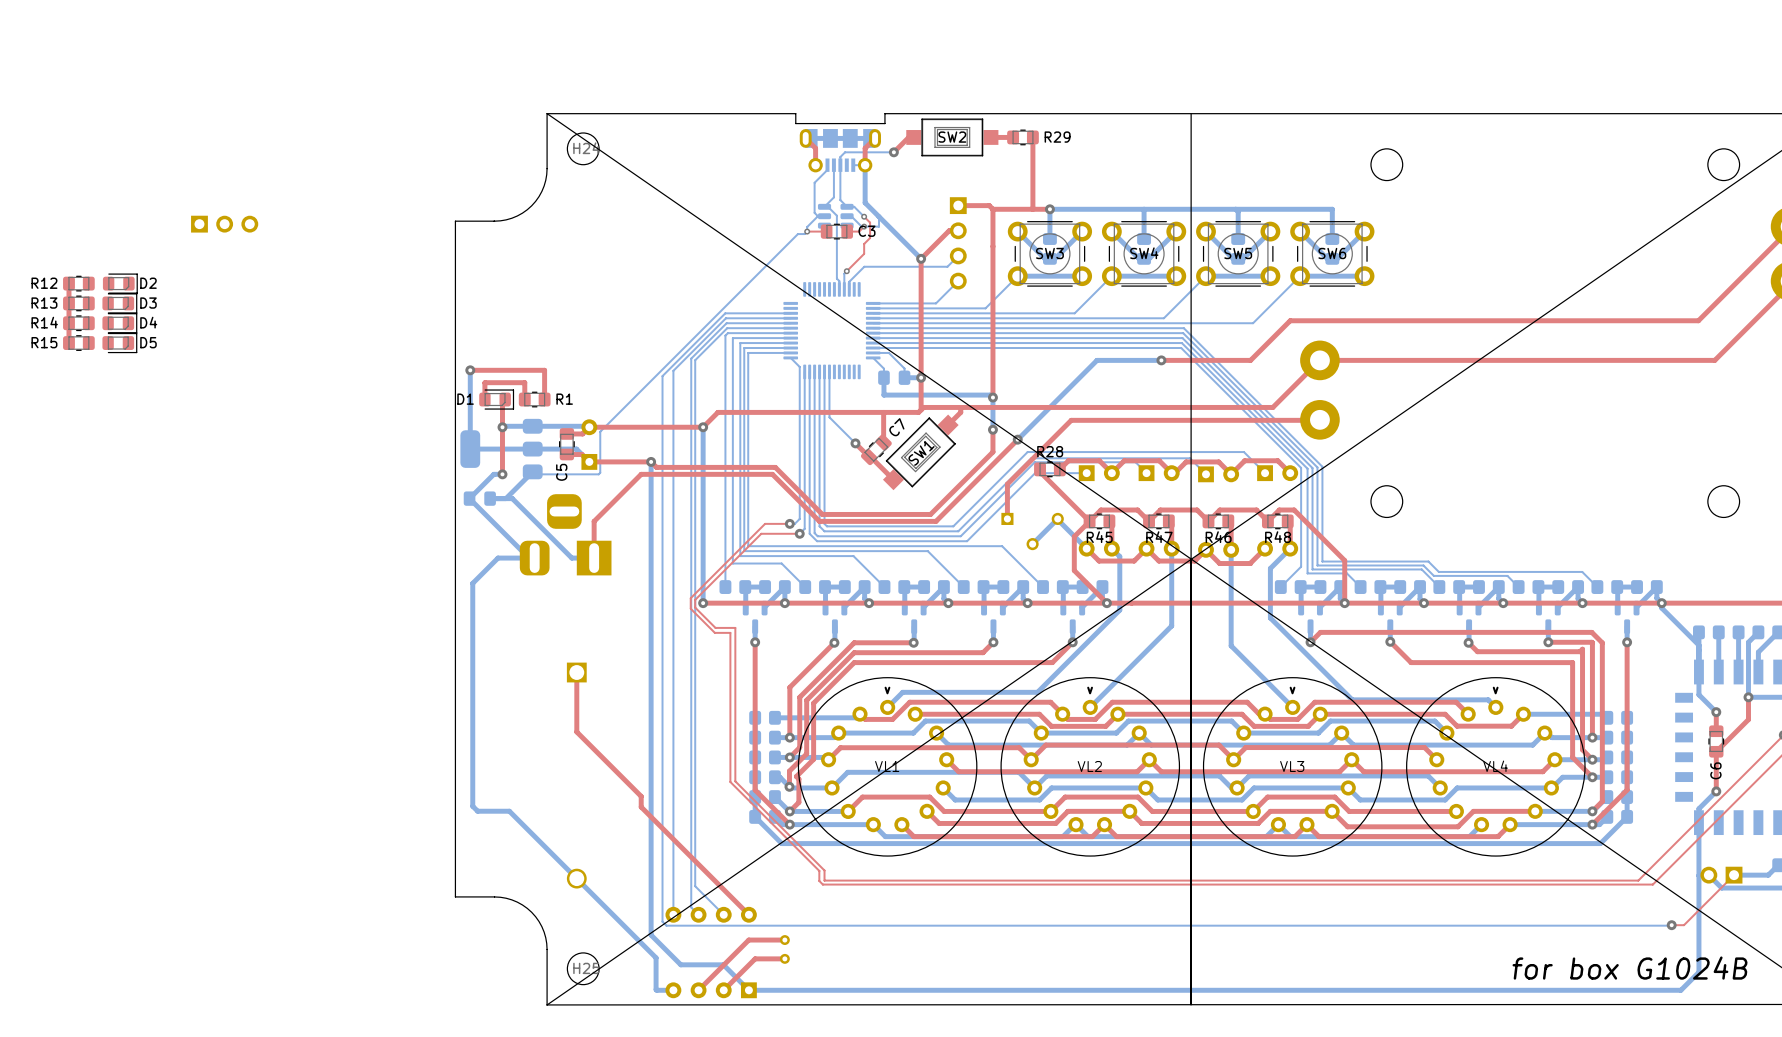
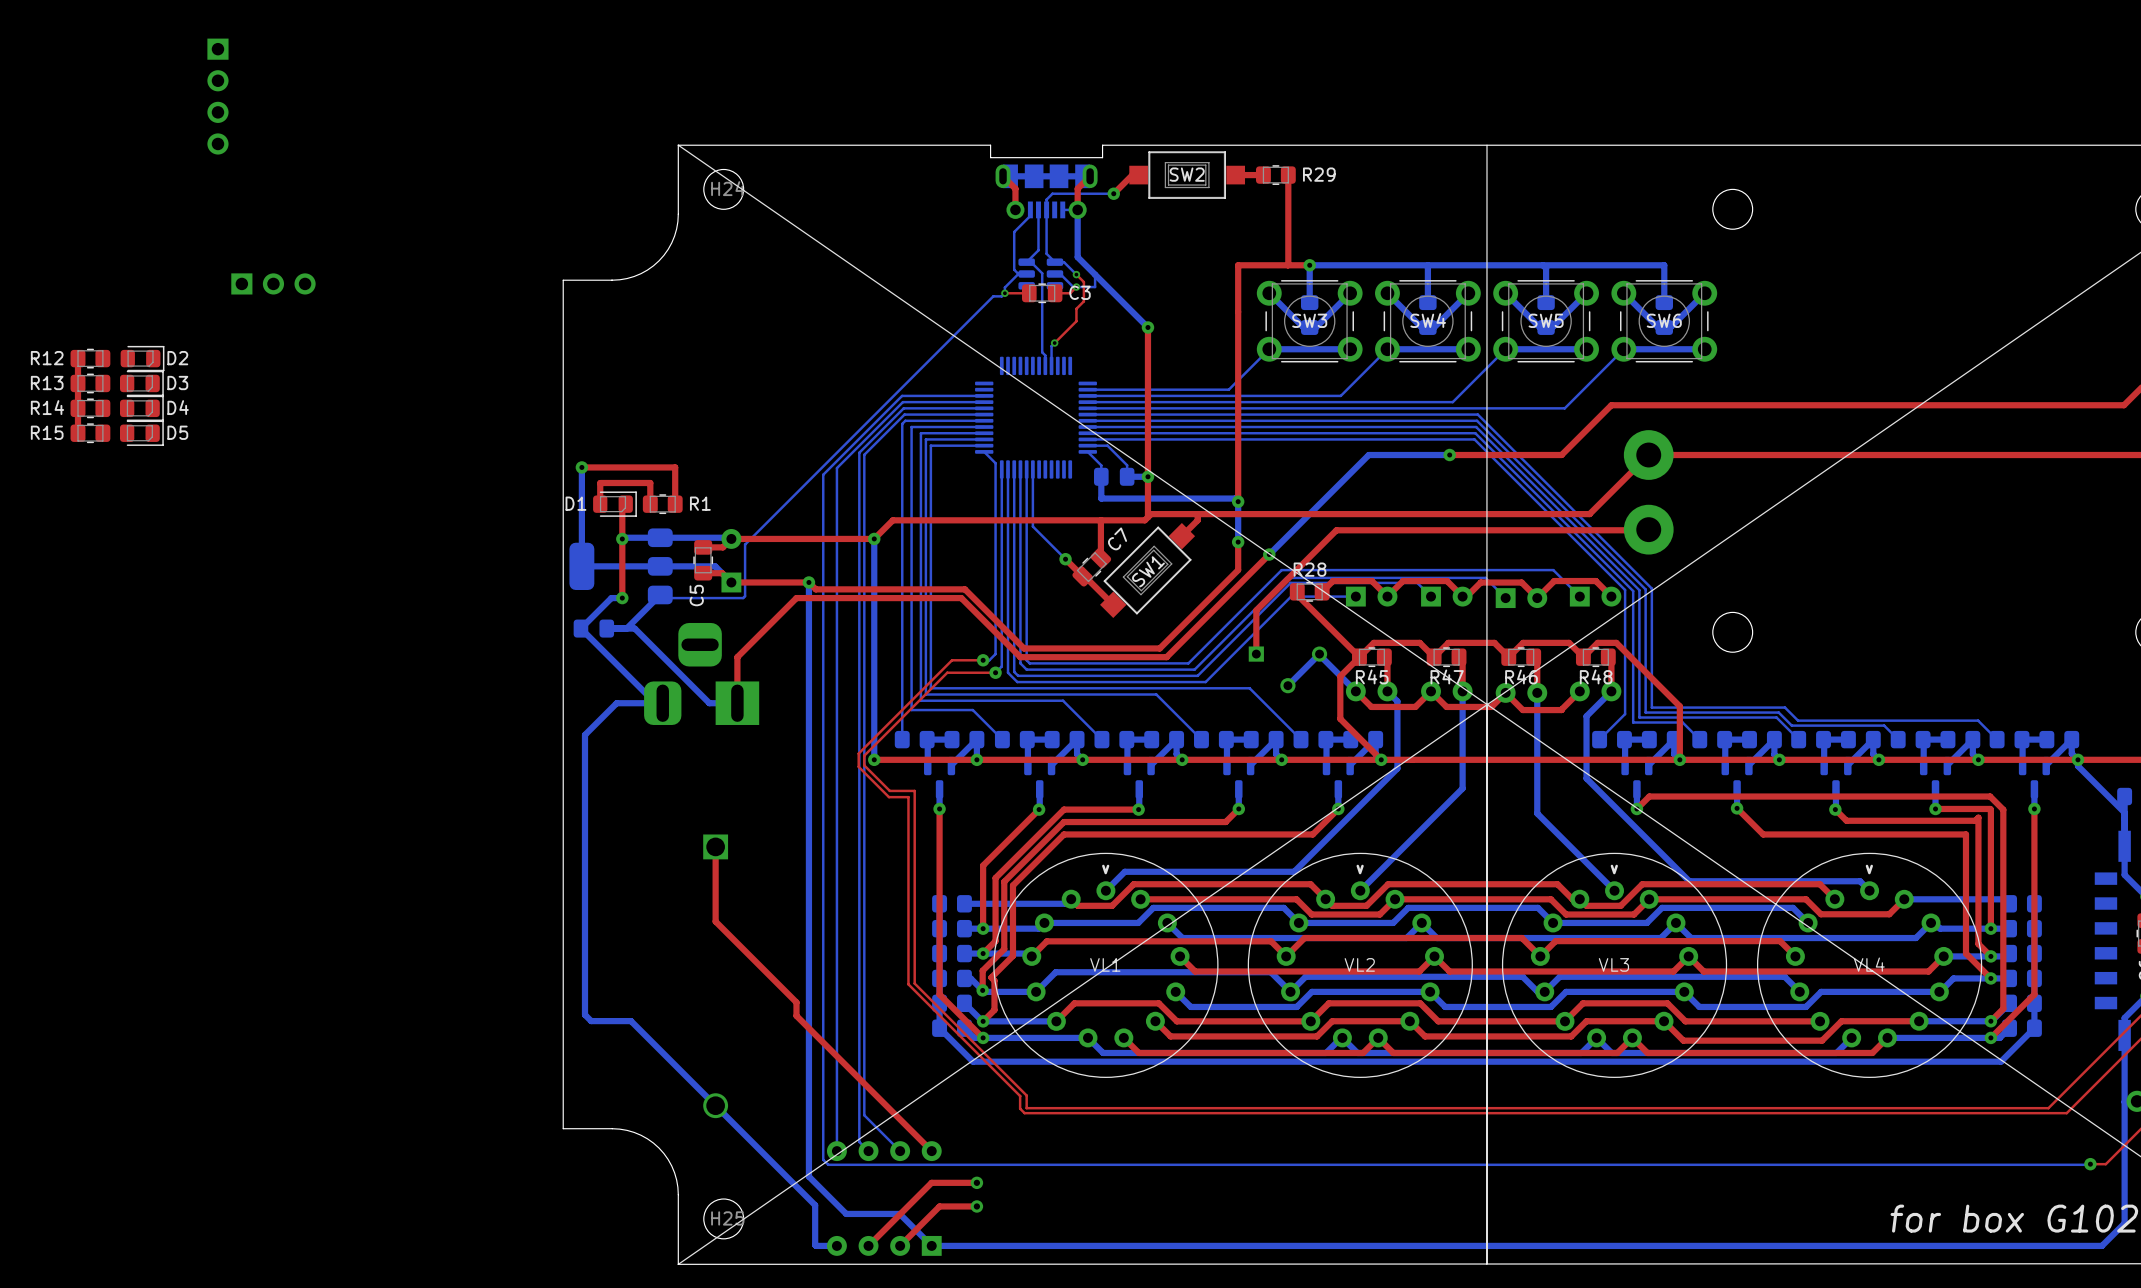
part: none -> (217, 96)
top track: (958, 205) (989, 205) (992, 209) -> none
top track: (958, 230) (949, 230) (921, 258) -> none
part: (958, 243) -> none
bottom track: (958, 255) (947, 266) (864, 266) (849, 281) (849, 289) -> none
bottom track: (958, 281) (935, 303) (873, 303) -> none

